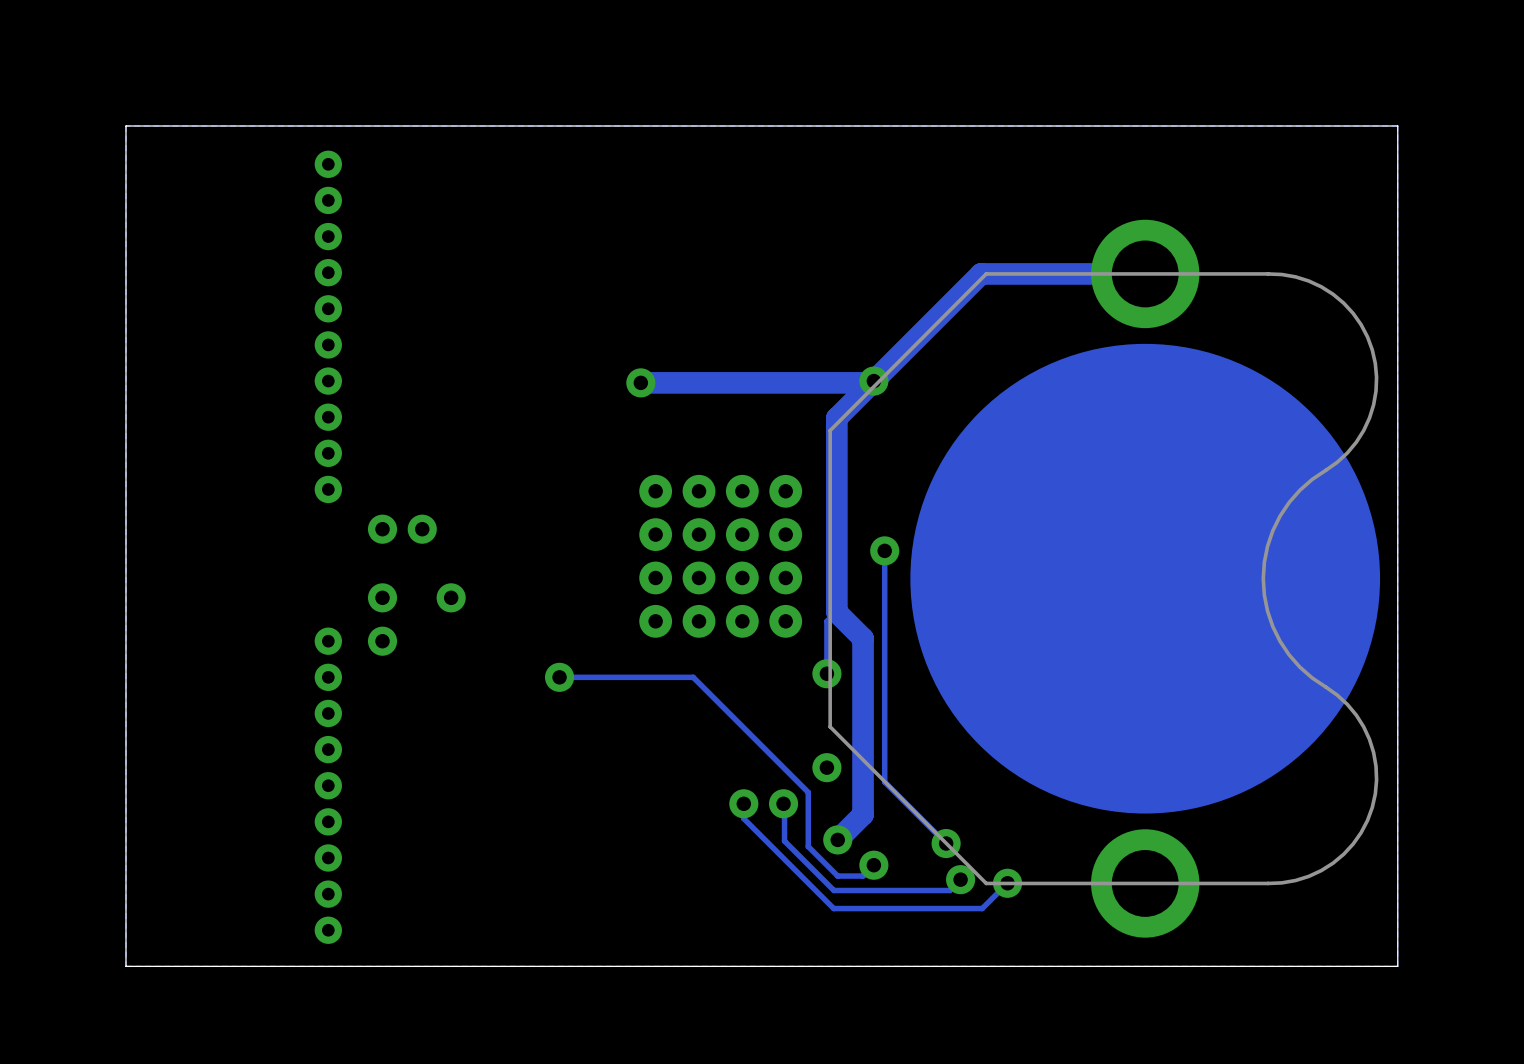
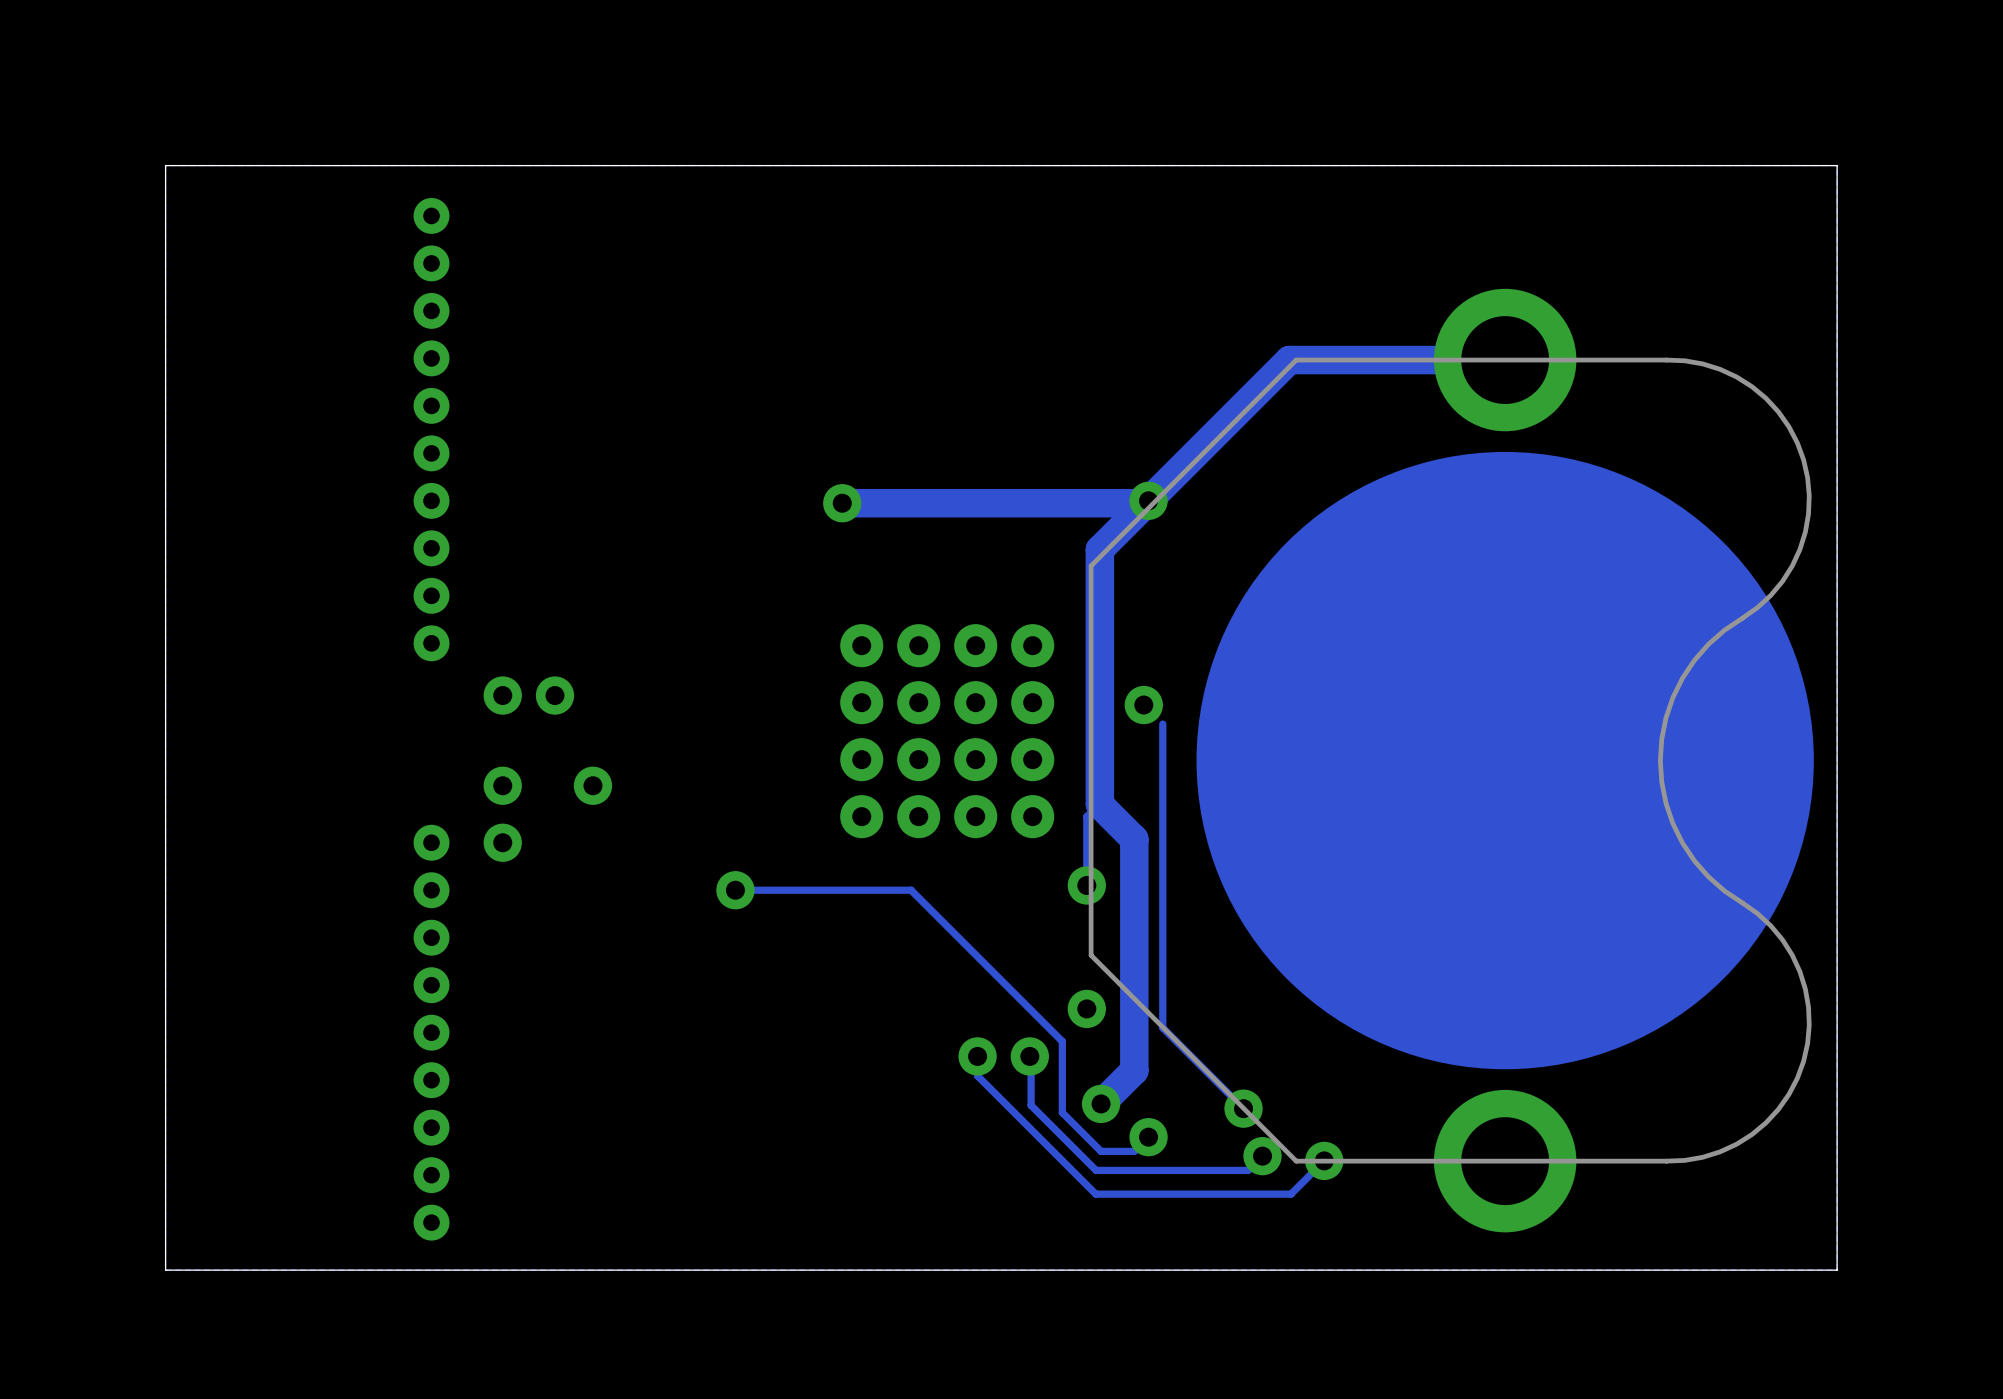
via position: (884, 550) -> (1143, 705)

